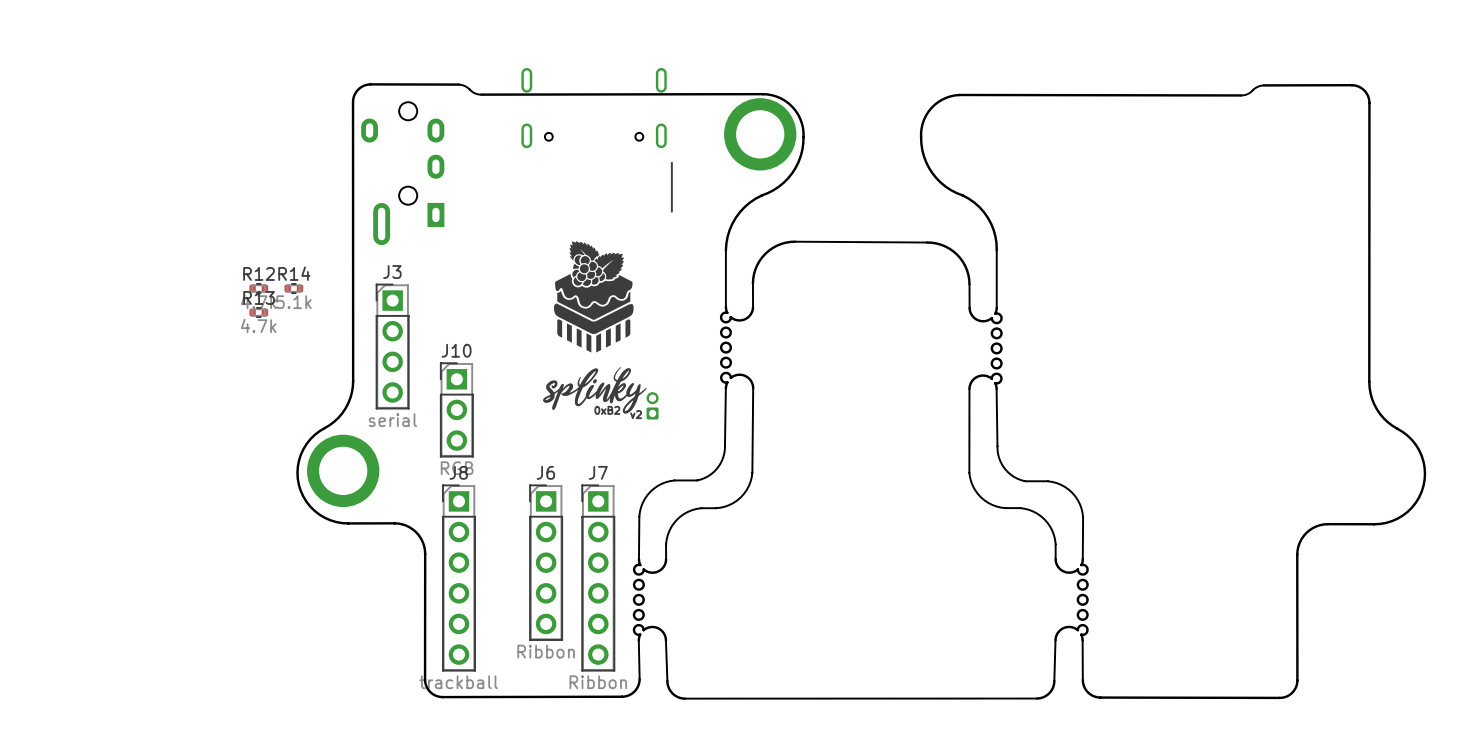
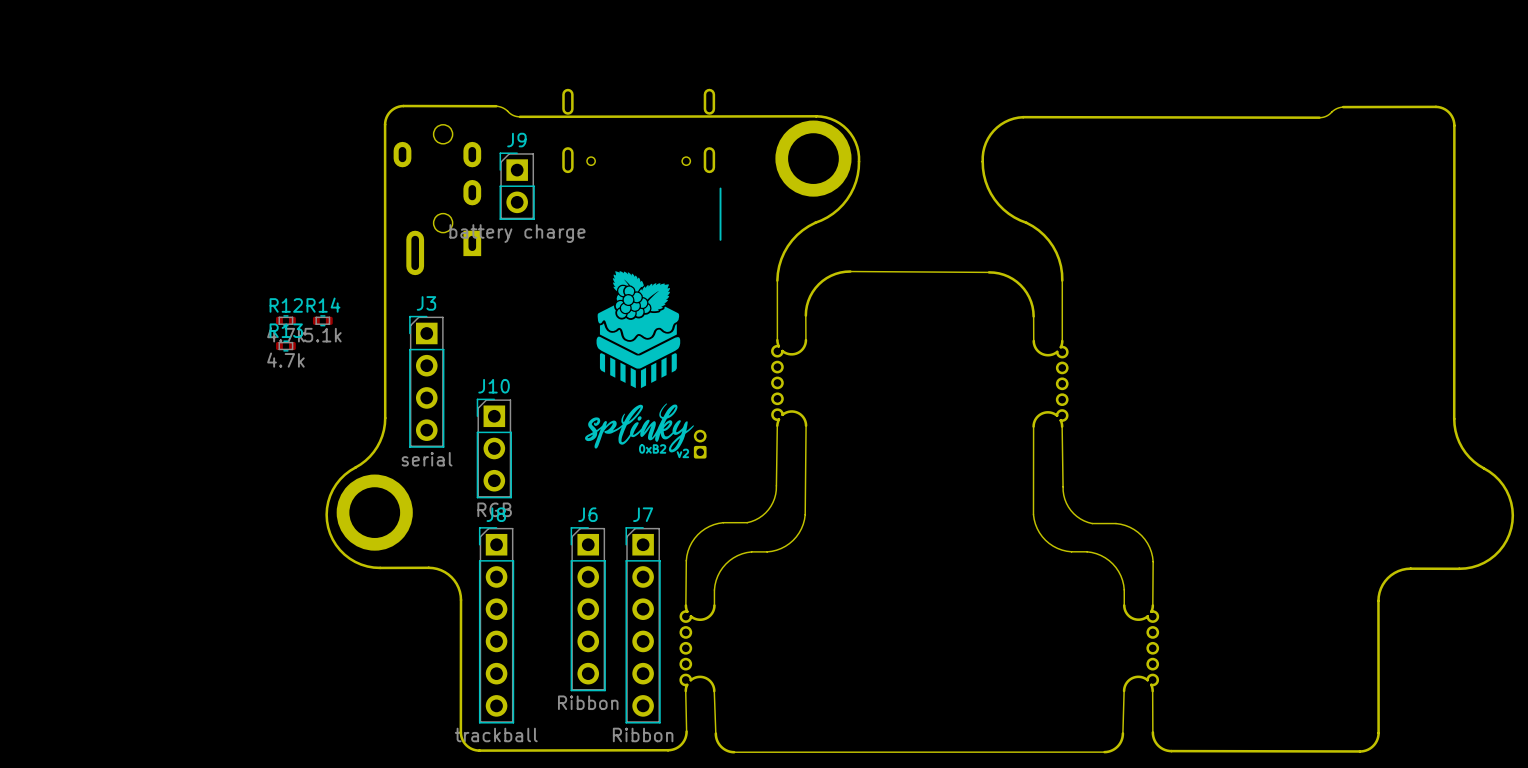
J9: none -> battery charge (517, 186)

